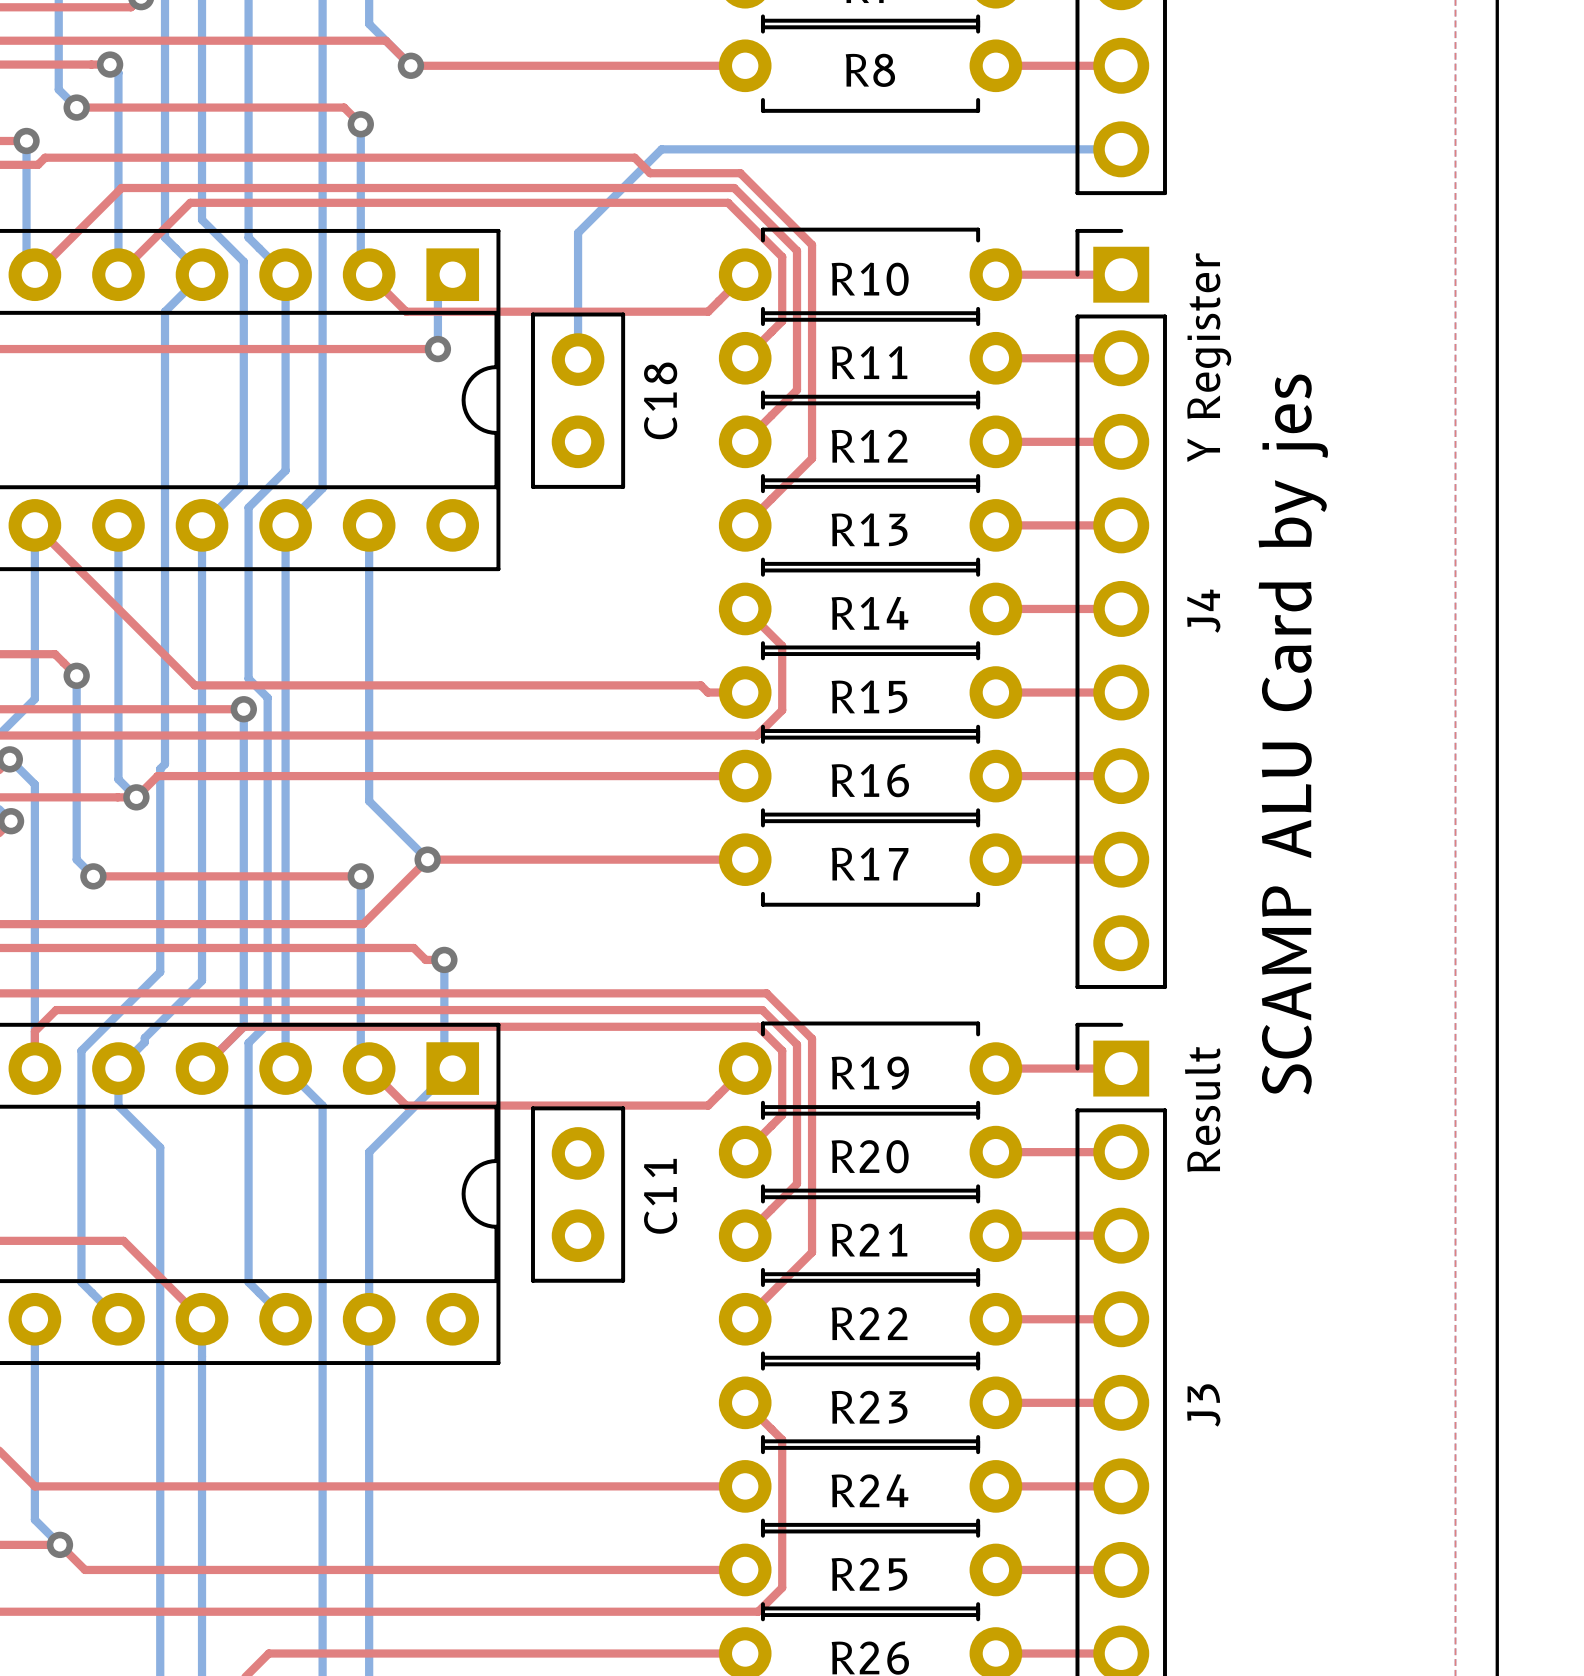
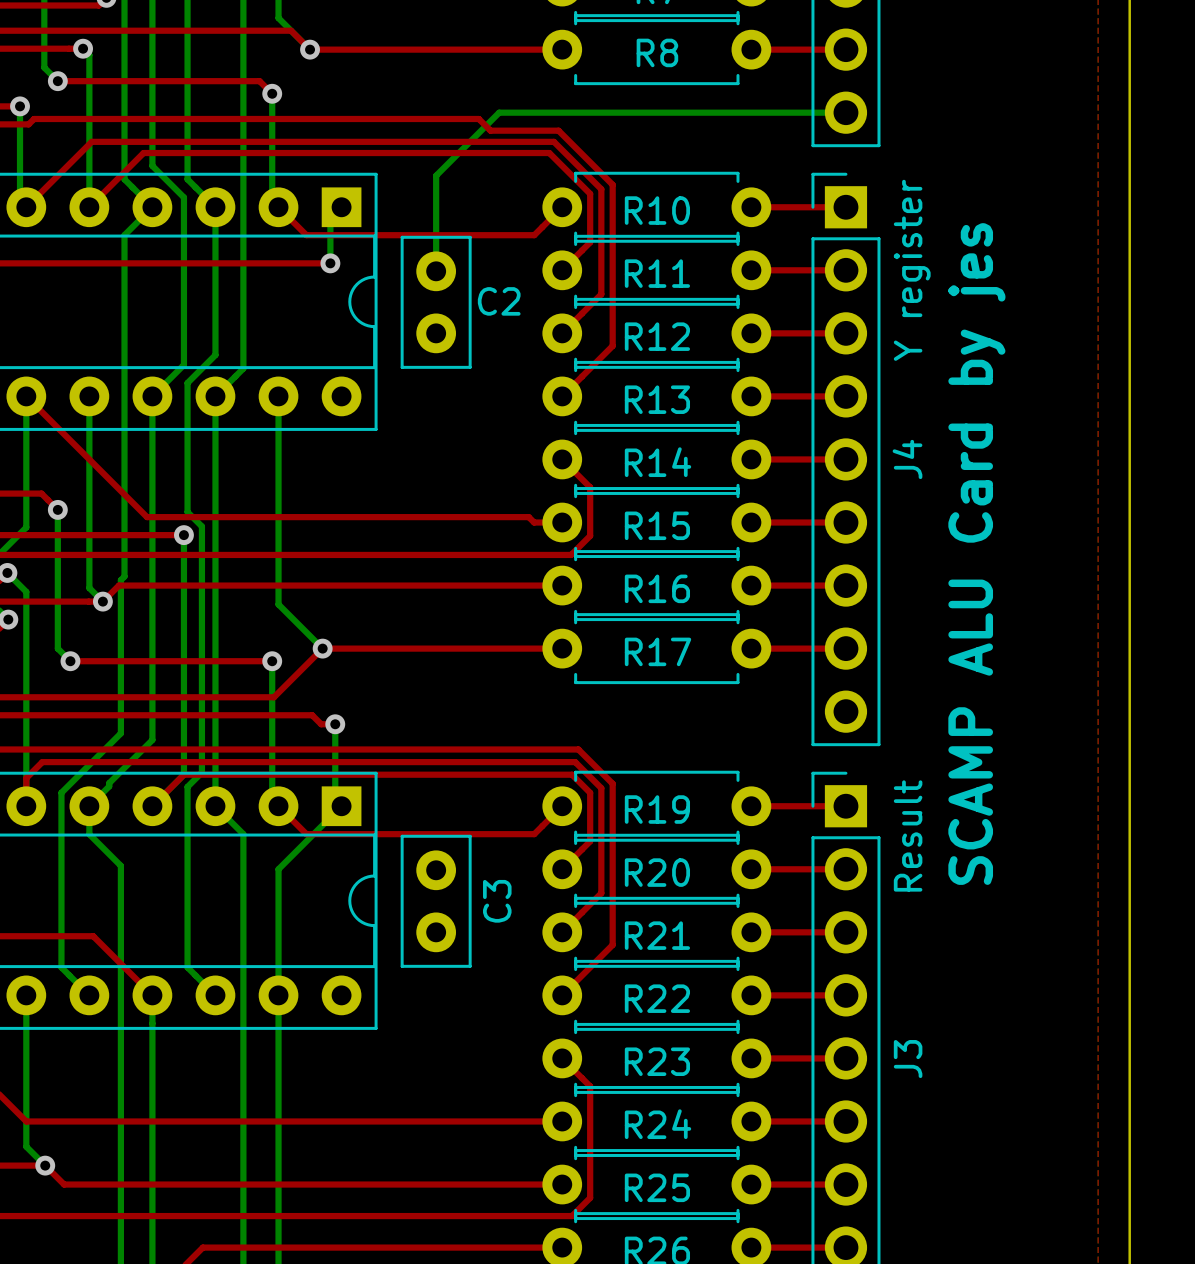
text: Y Register (1209, 357) -> Y register (912, 270)
C18 name: C18 (660, 400) -> C2 (499, 301)
C11 name: C11 (660, 1196) -> C3 (497, 901)

